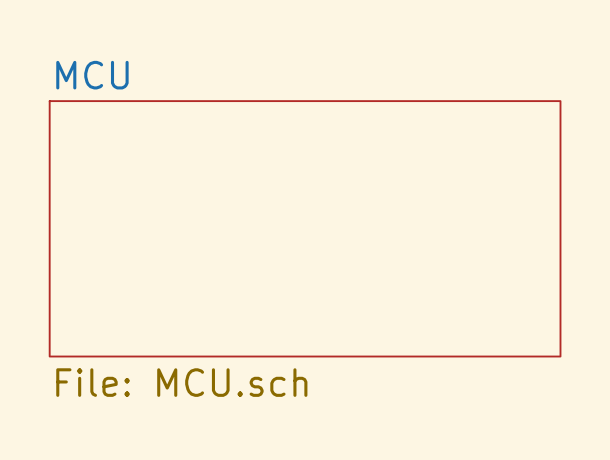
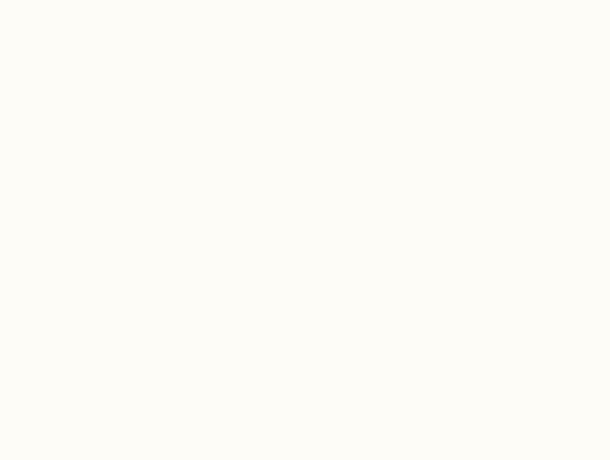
sheet MCU: File: MCU.sch (305, 228) -> none

